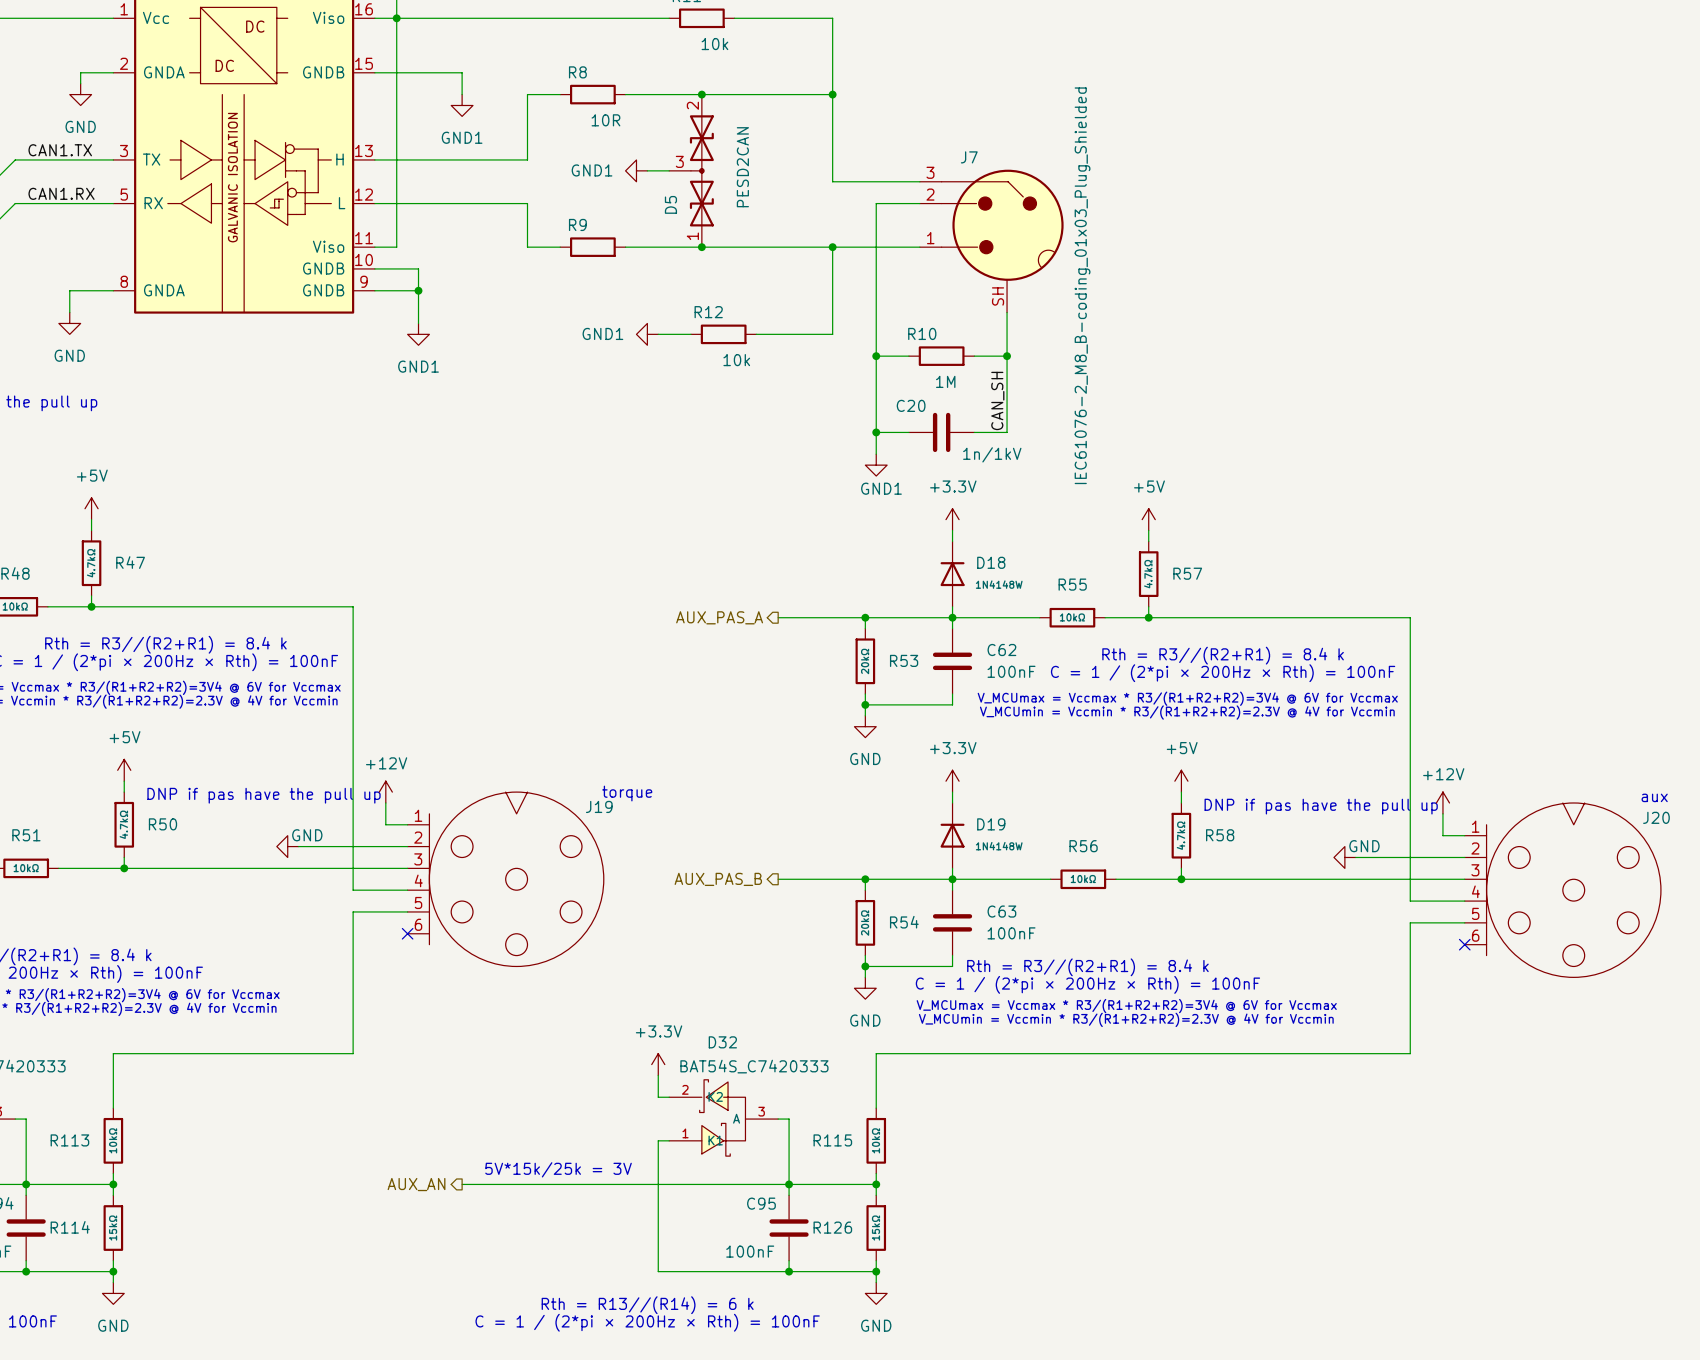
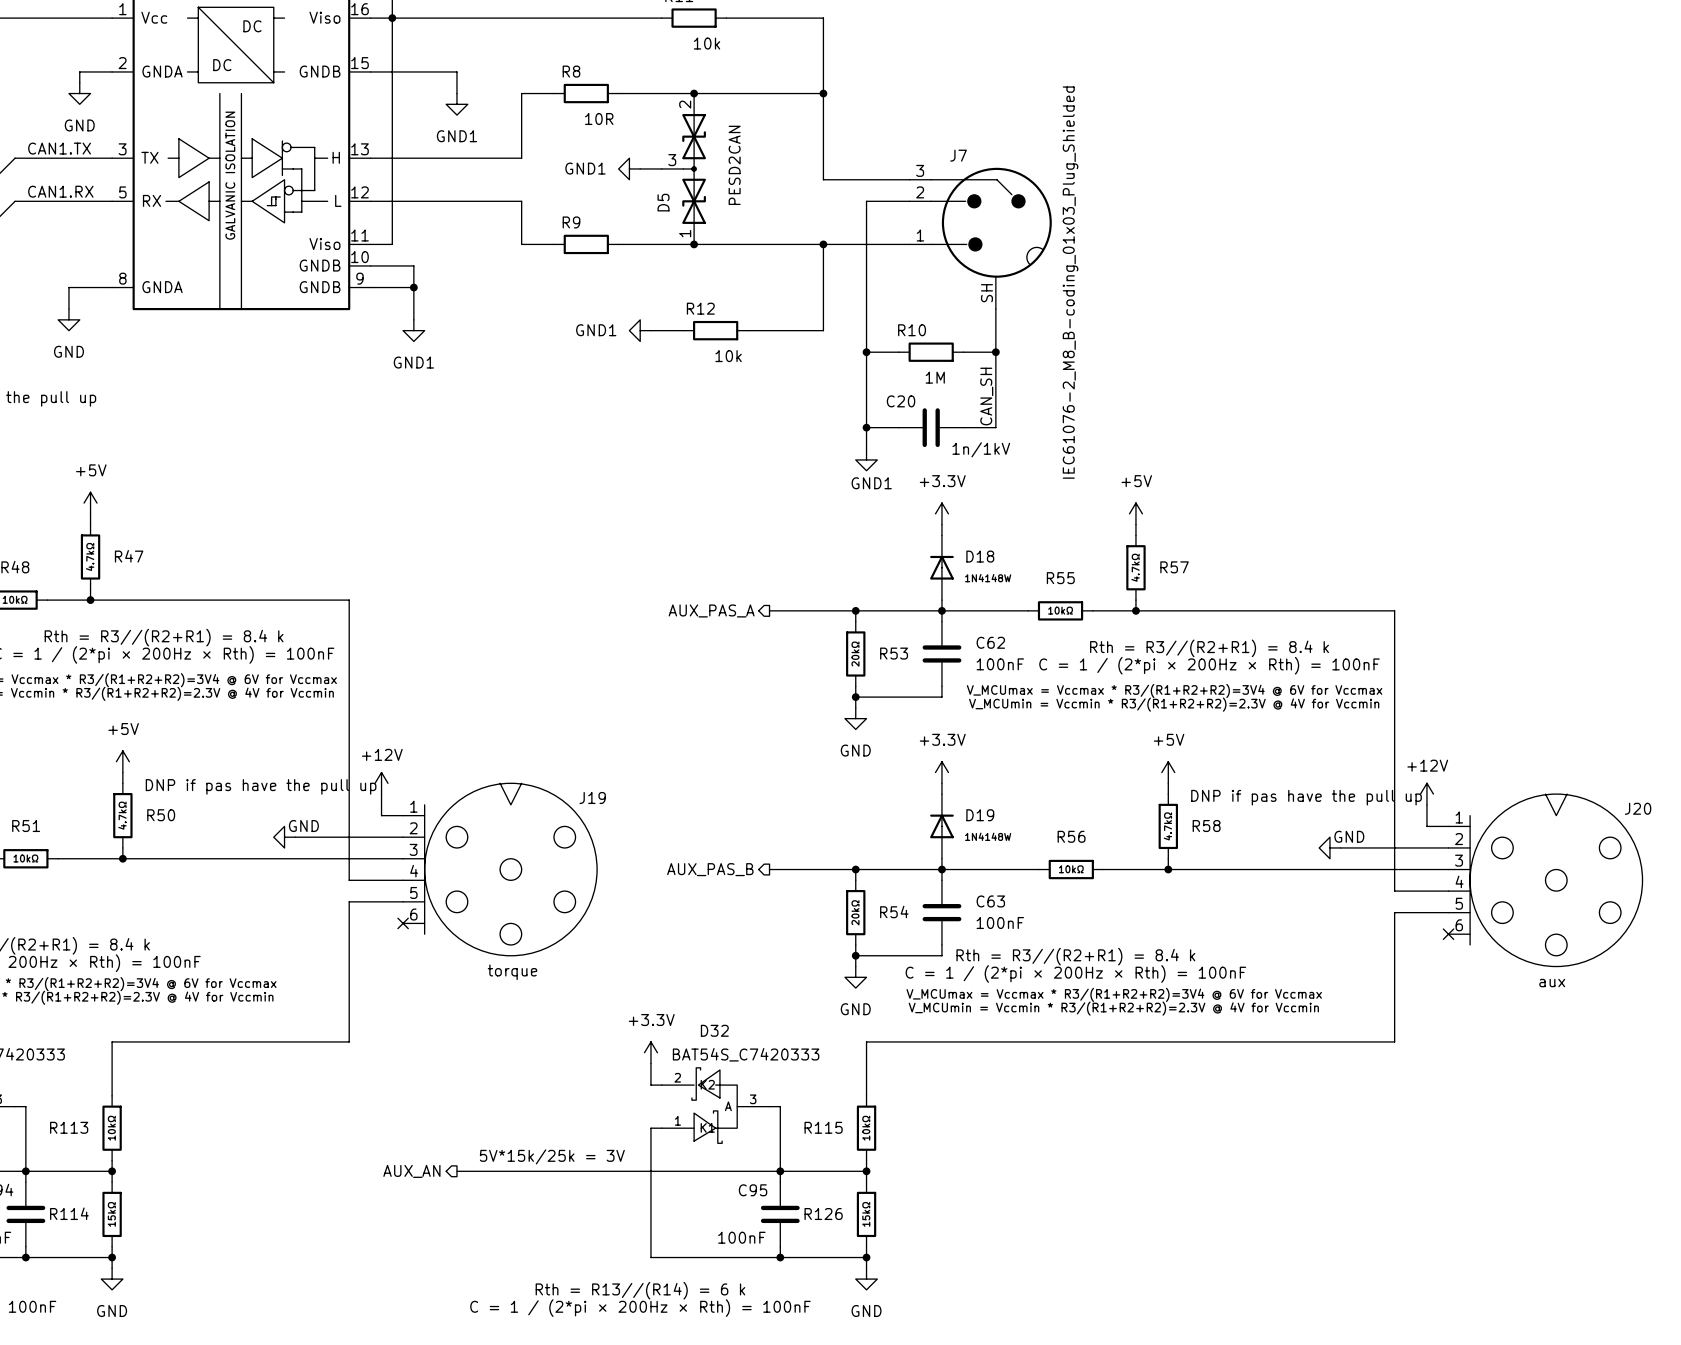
text: torque (627, 793) -> none
text position: aux (1654, 797) -> aux (1552, 983)
text: none -> torque (512, 972)

